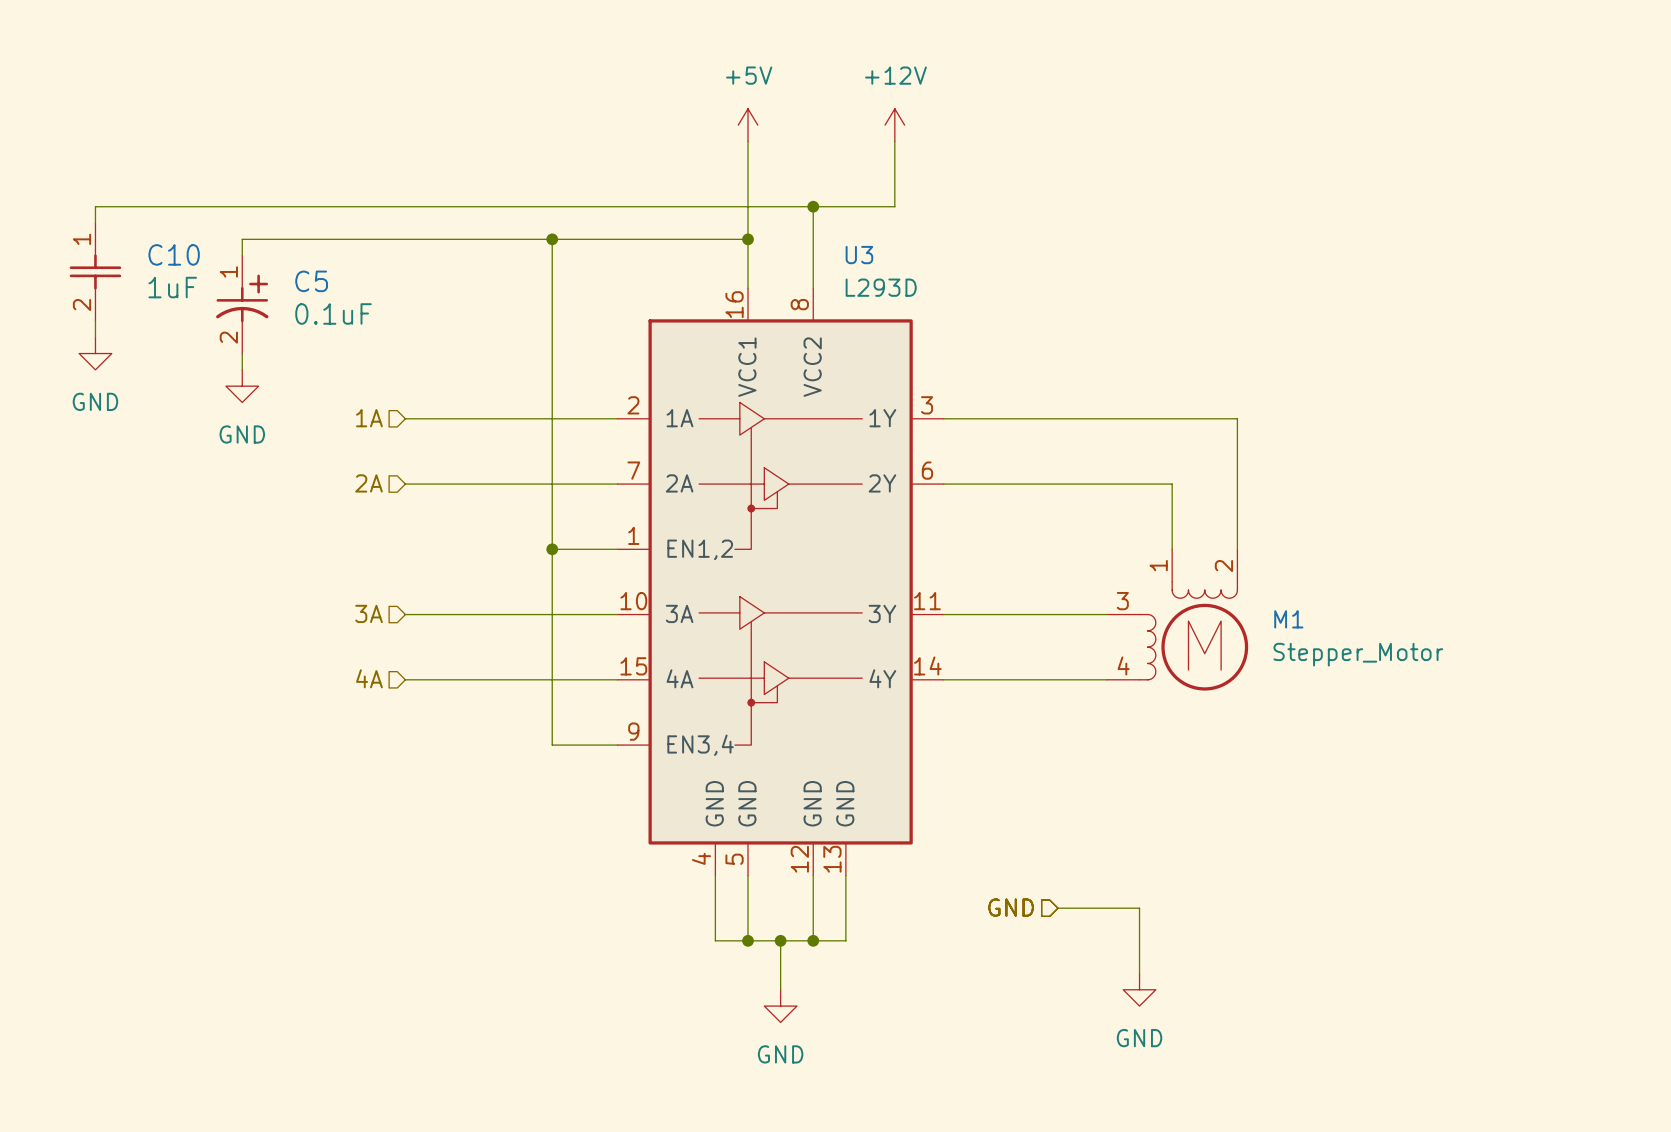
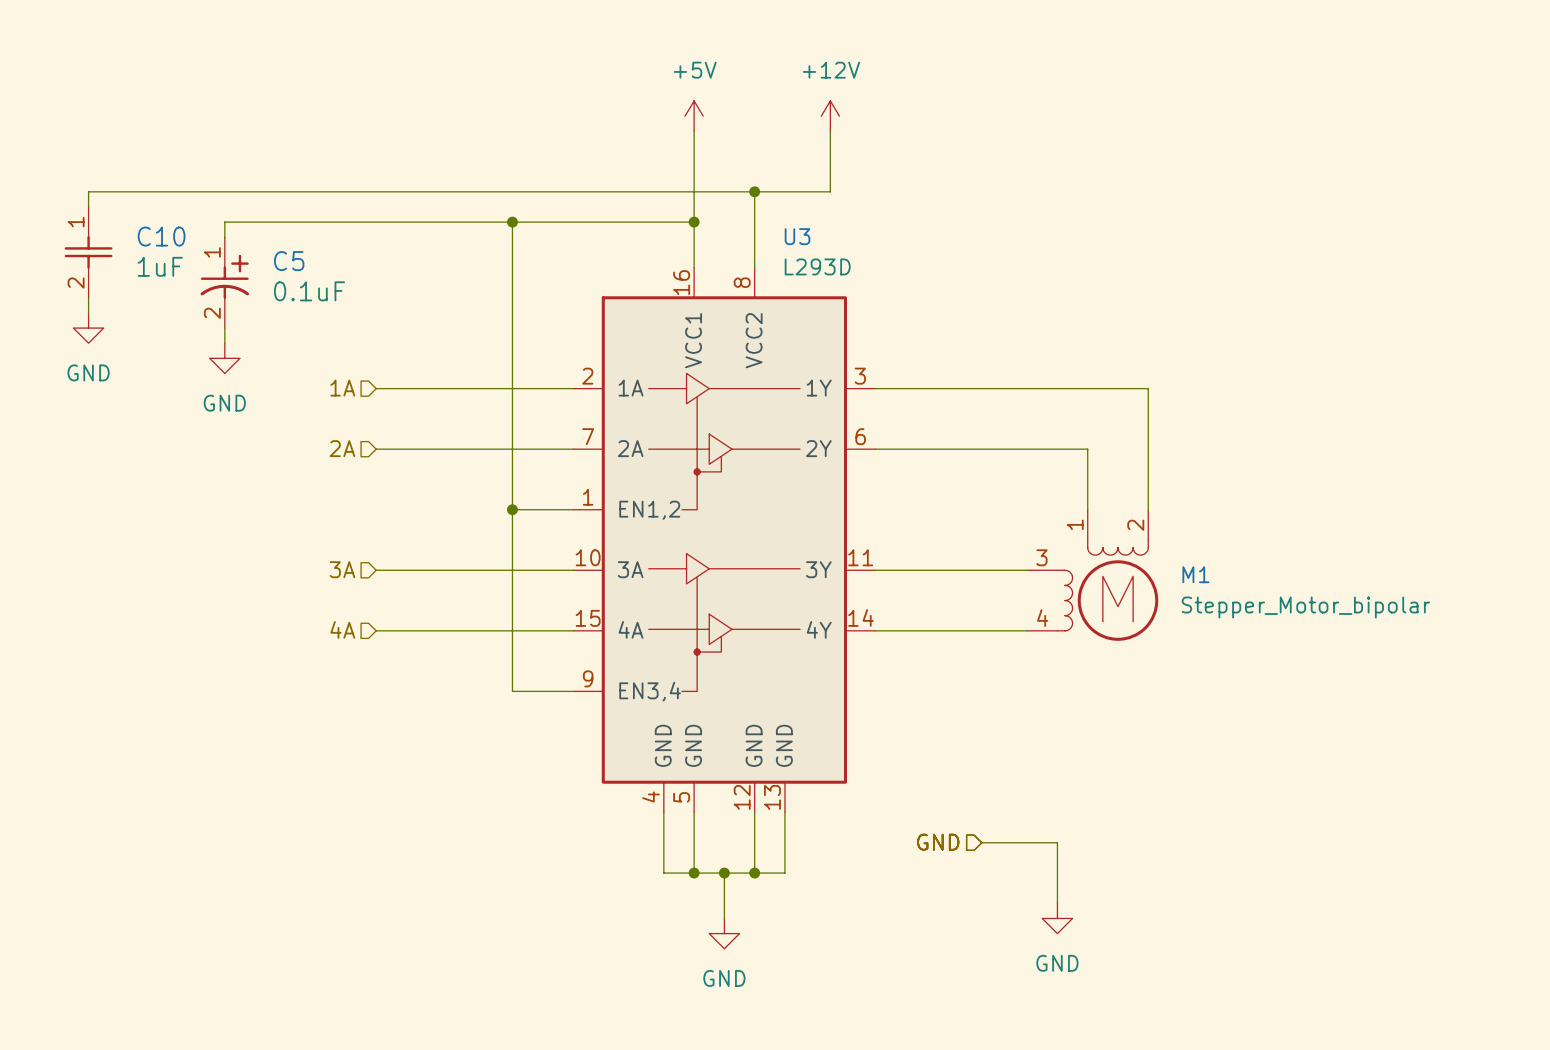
M1 value: Stepper_Motor (1358, 654) -> Stepper_Motor_bipolar (1305, 607)

